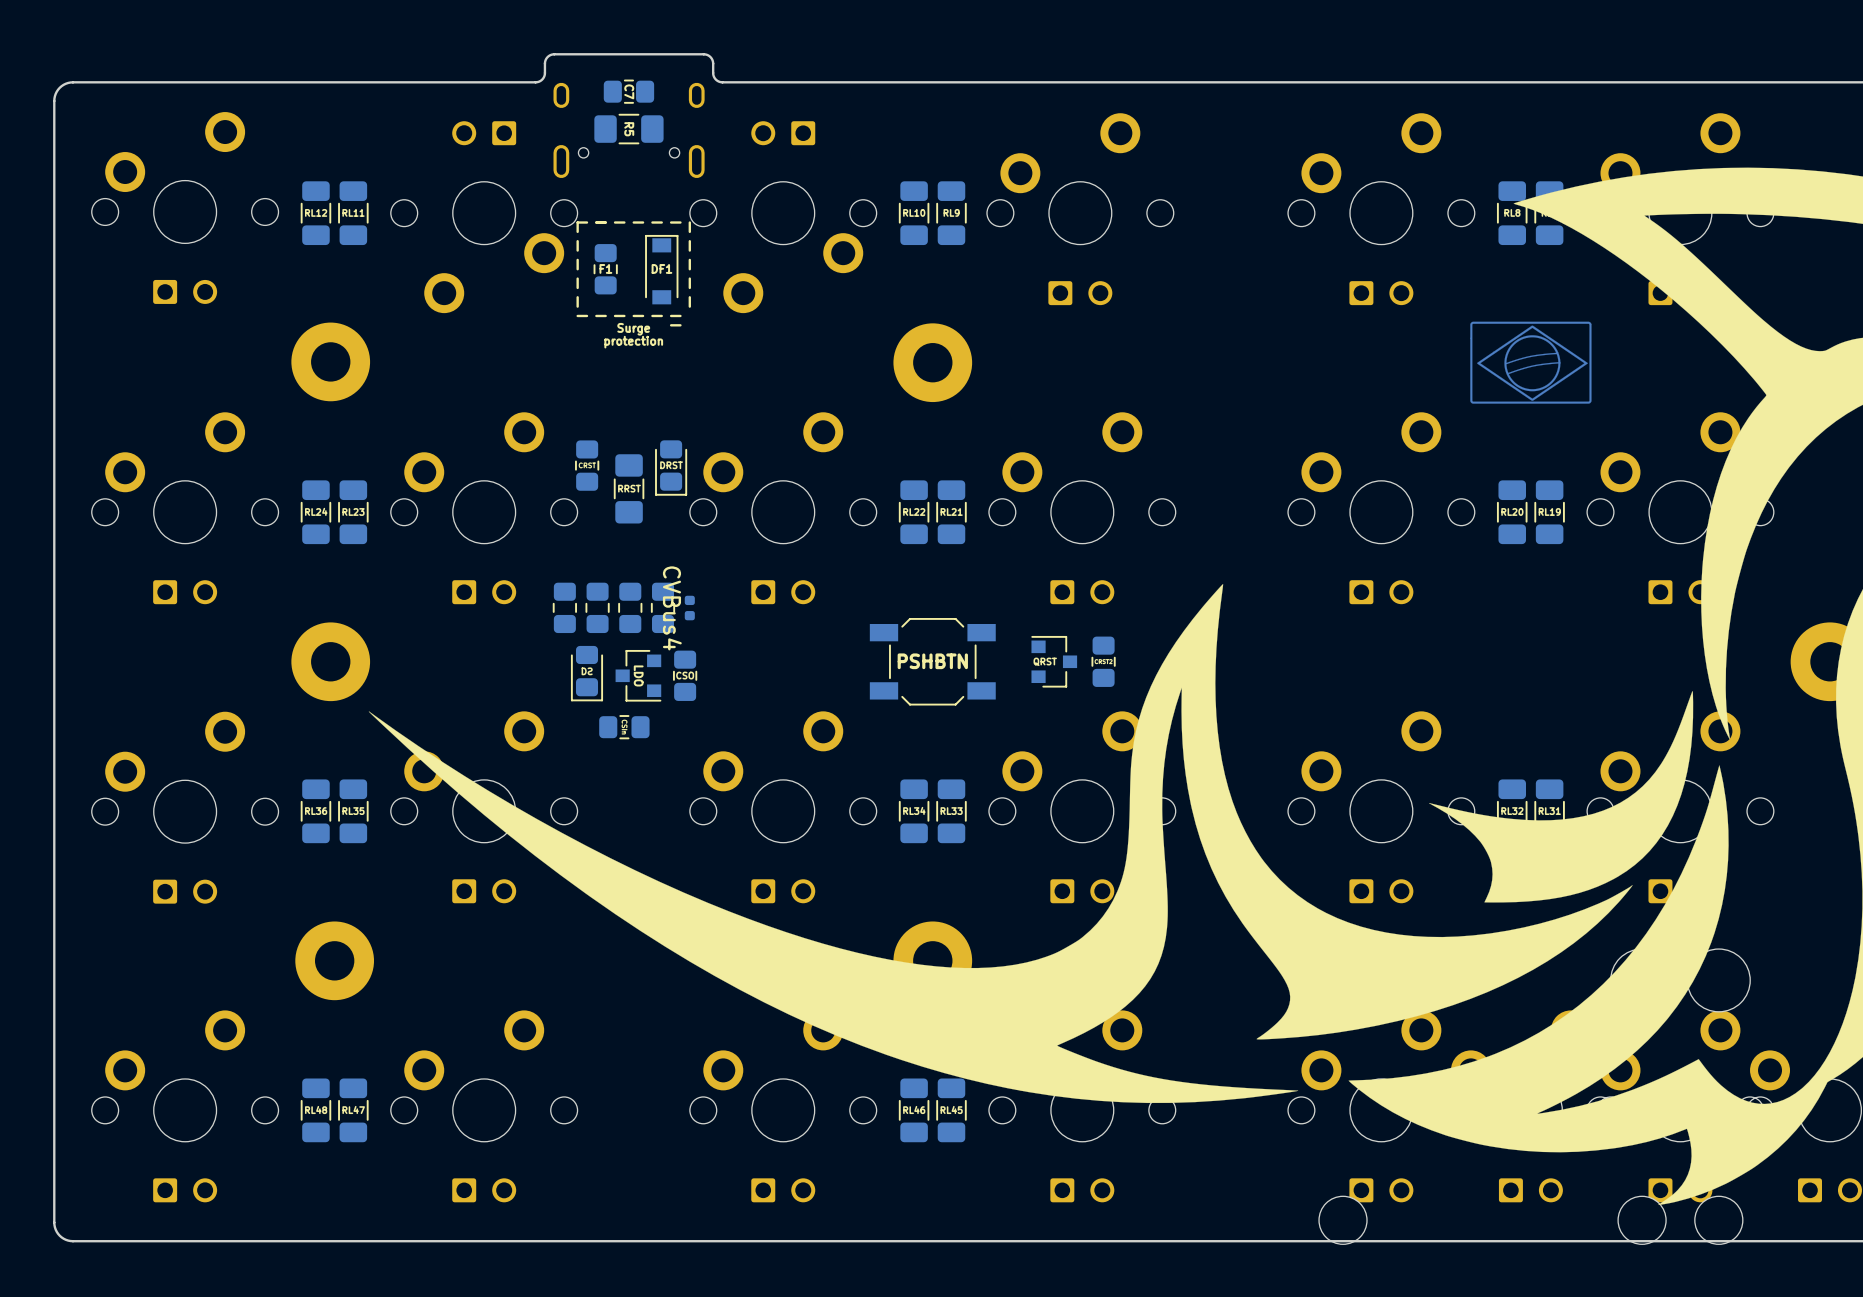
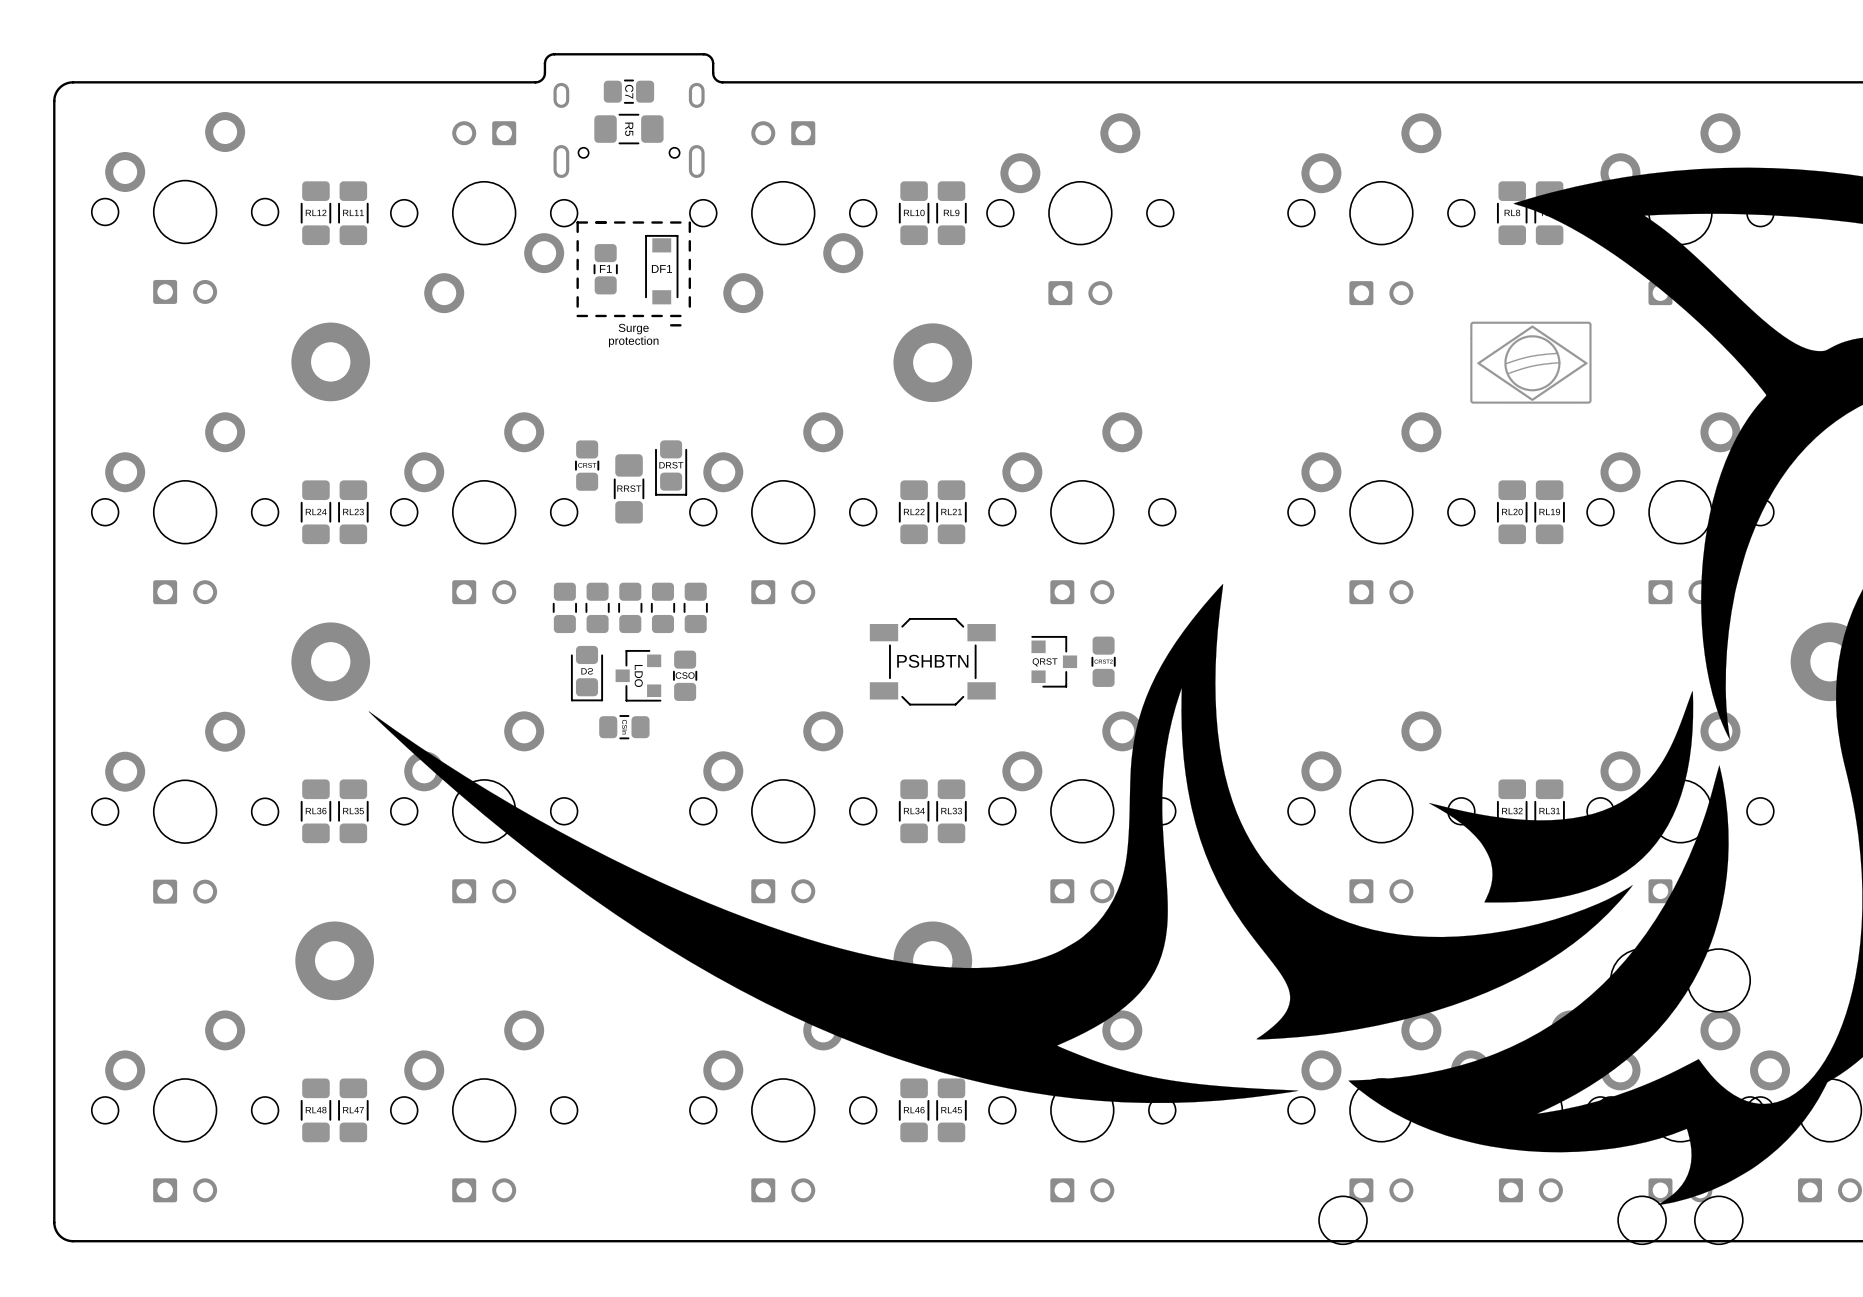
part: none -> (695, 607)
CVBus4: (689, 608) -> none

